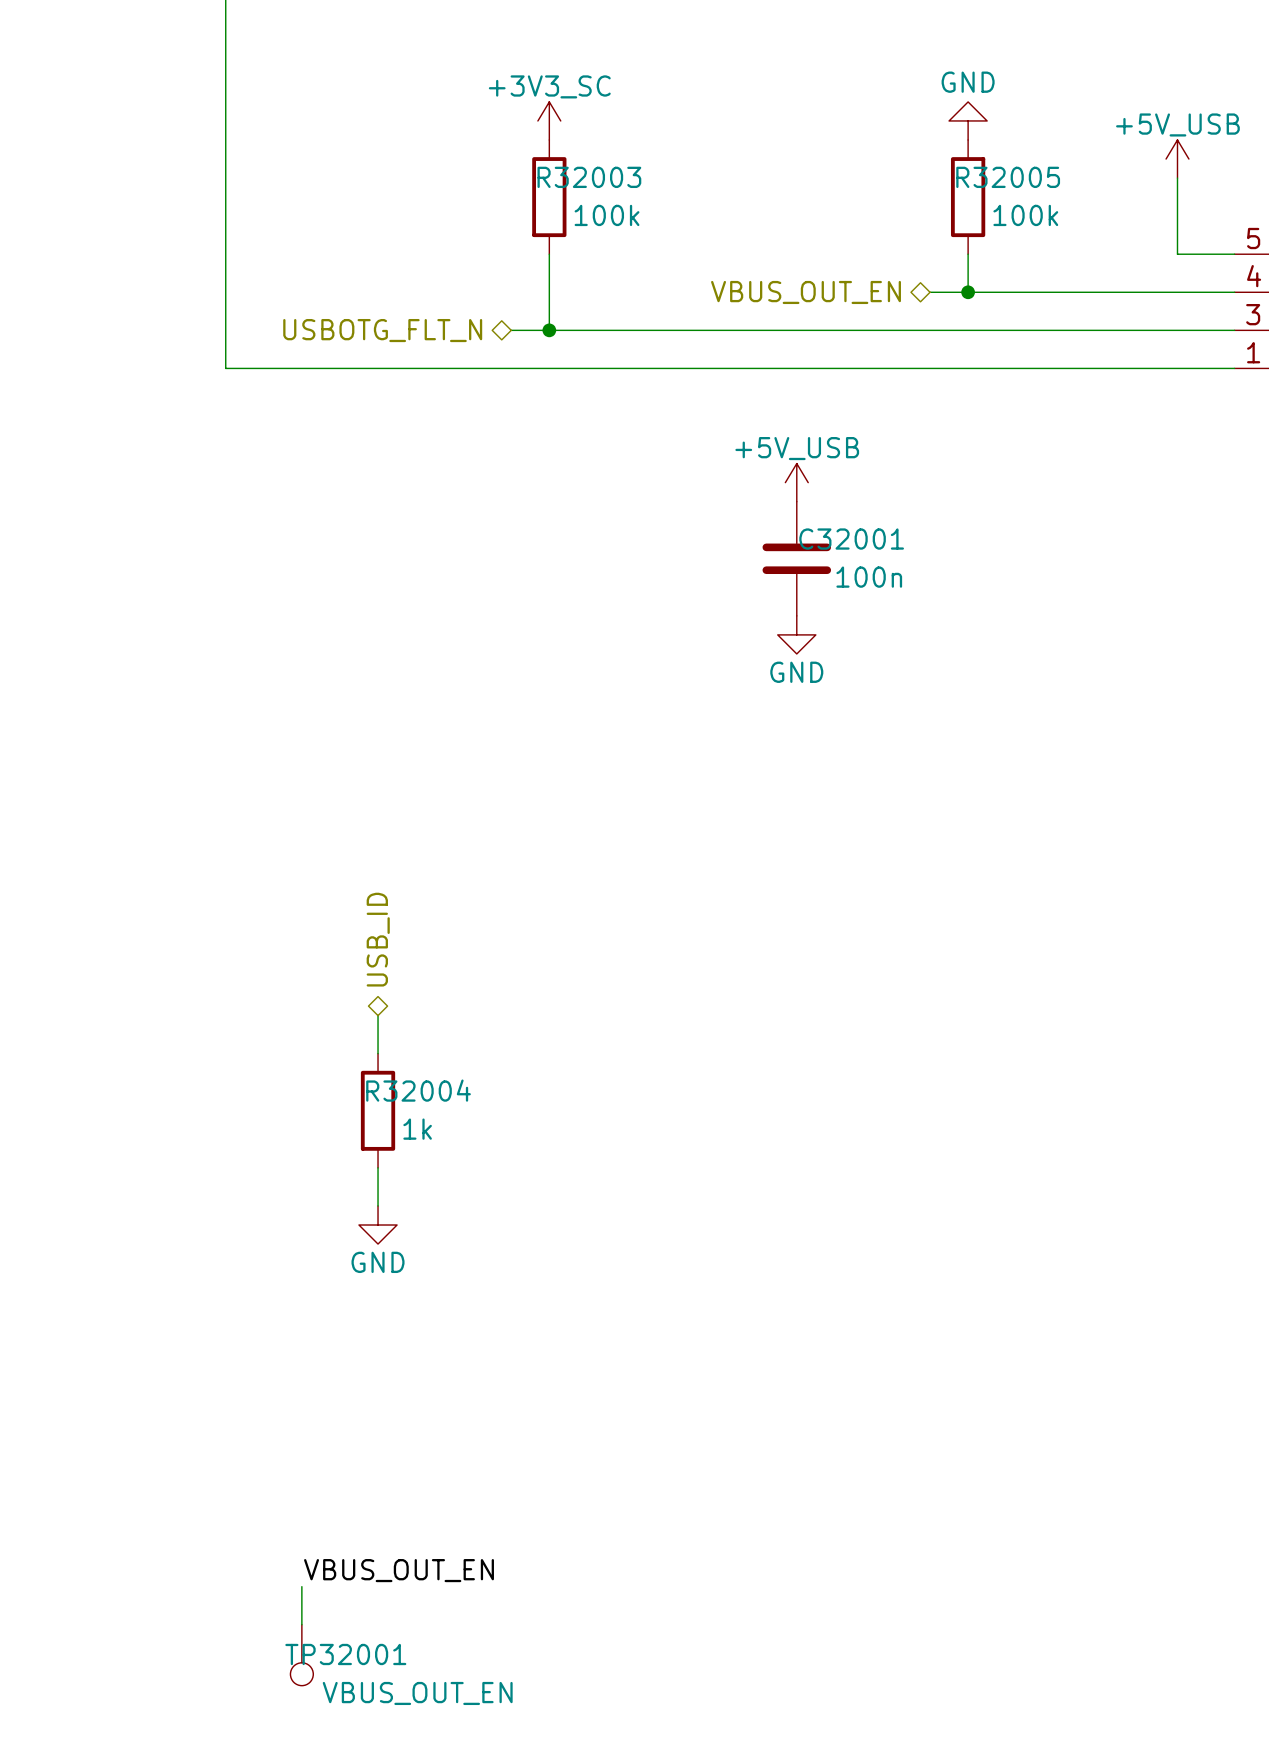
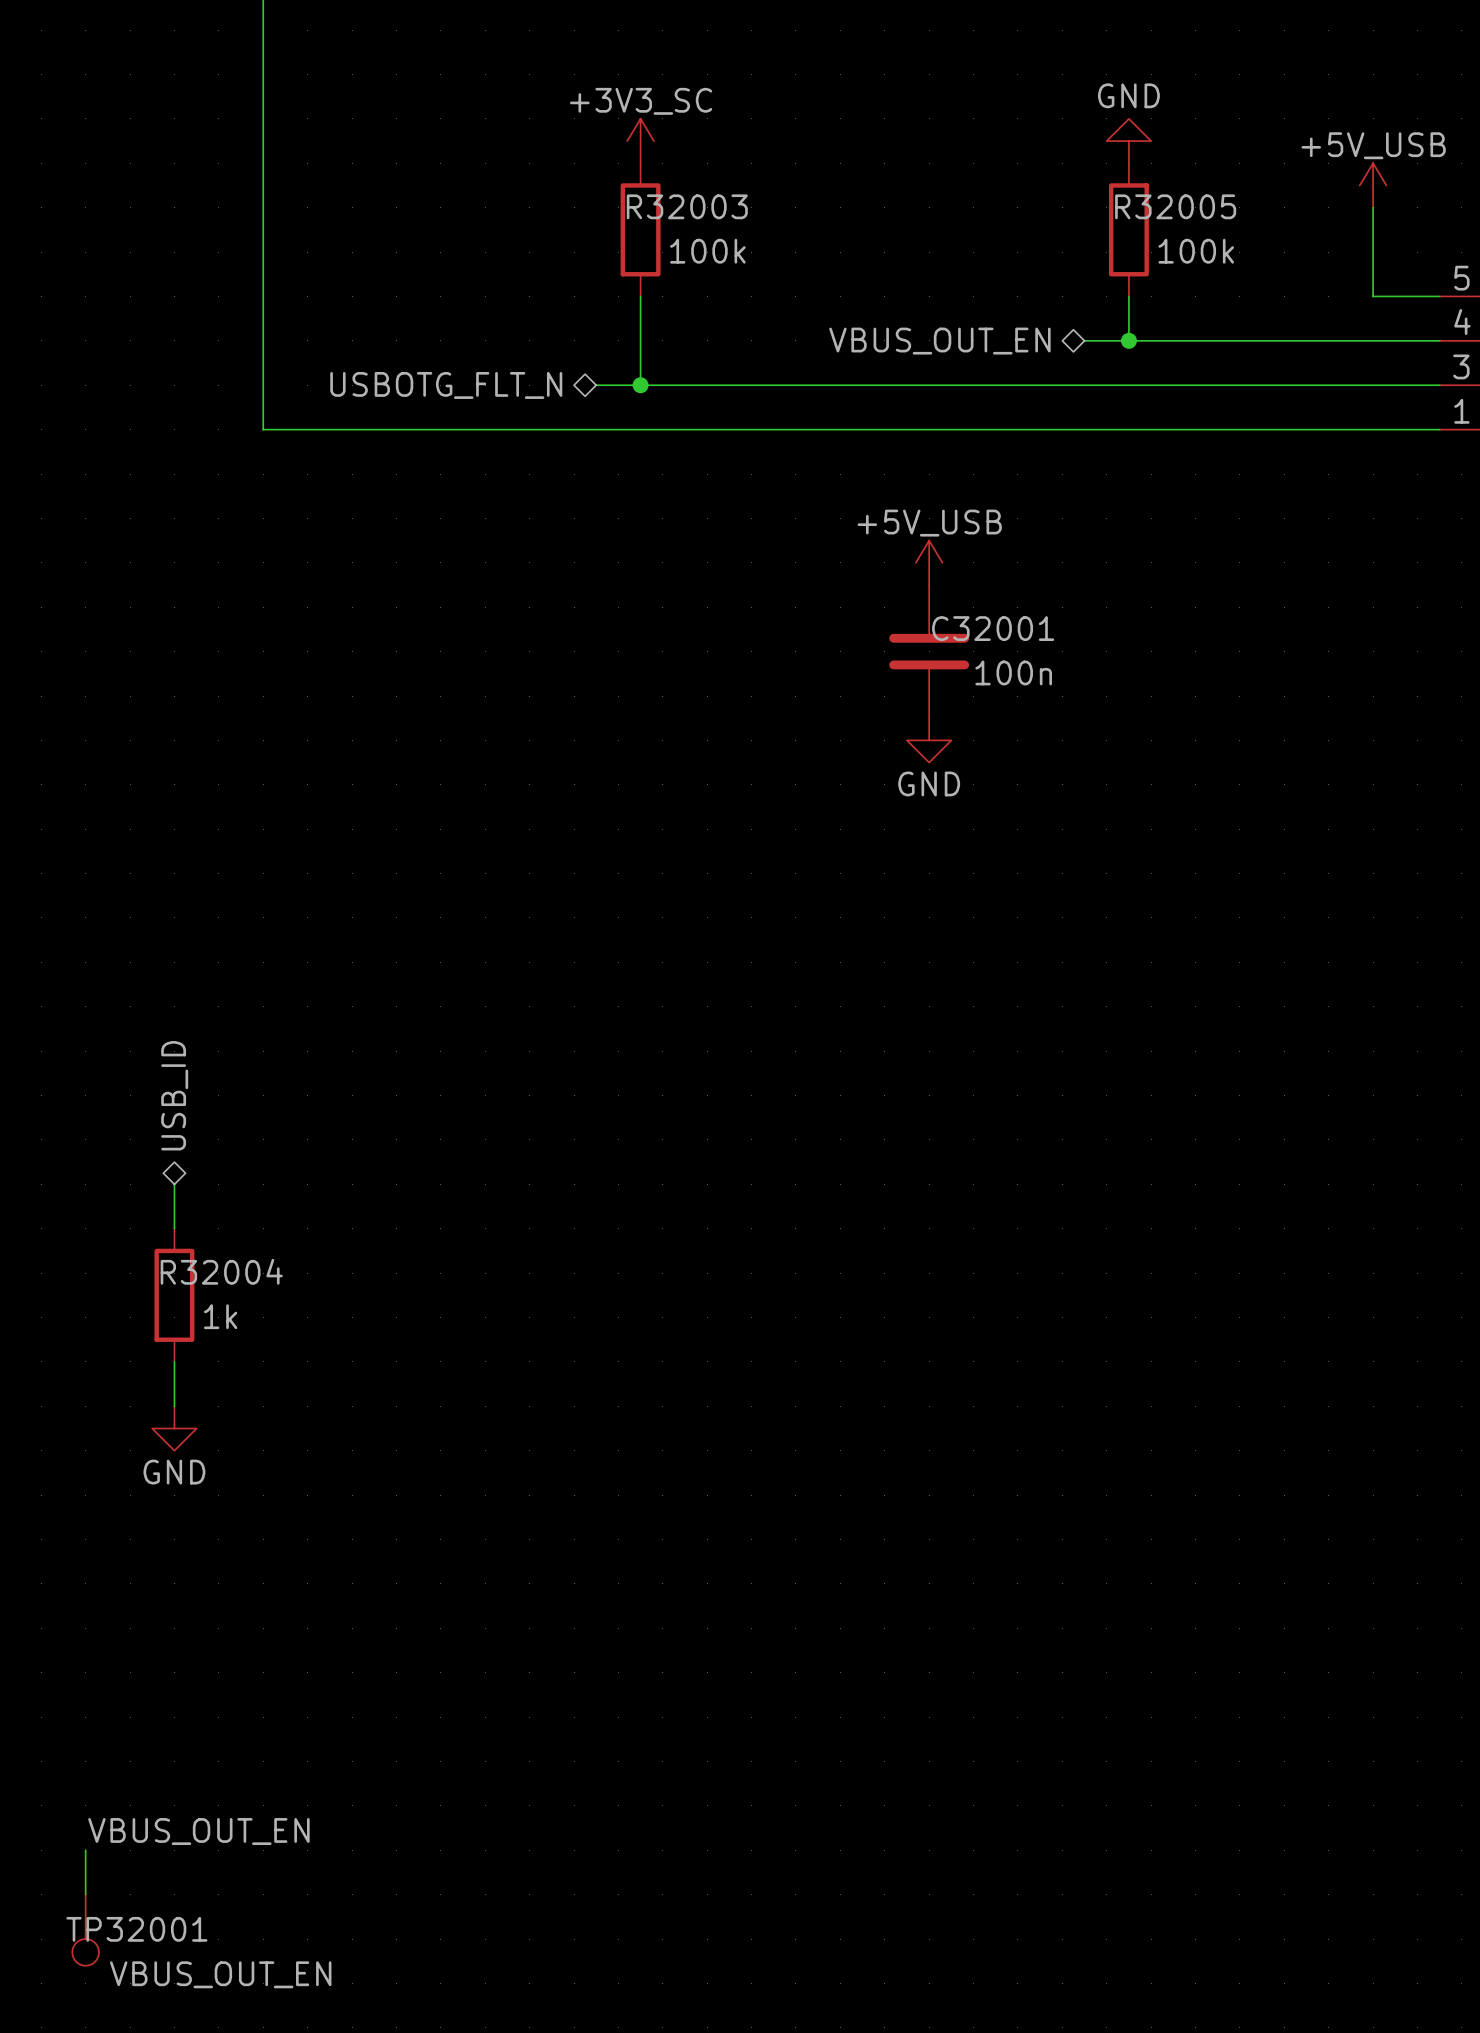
hierarchical label position: USB_ID (378, 939) -> USB_ID (174, 1095)
wire: (378, 1015) (378, 1053) -> (174, 1184) (174, 1228)
R32004 position: (378, 1110) -> (174, 1295)
wire: (378, 1167) (378, 1205) -> (174, 1361) (174, 1406)
power symbol position: GND (378, 1225) -> GND (174, 1428)
label position: VBUS_OUT_EN (399, 1570) -> VBUS_OUT_EN (198, 1831)
wire: (301, 1586) (301, 1624) -> (85, 1850) (85, 1894)
TP32001 position: (301, 1655) -> (85, 1930)

